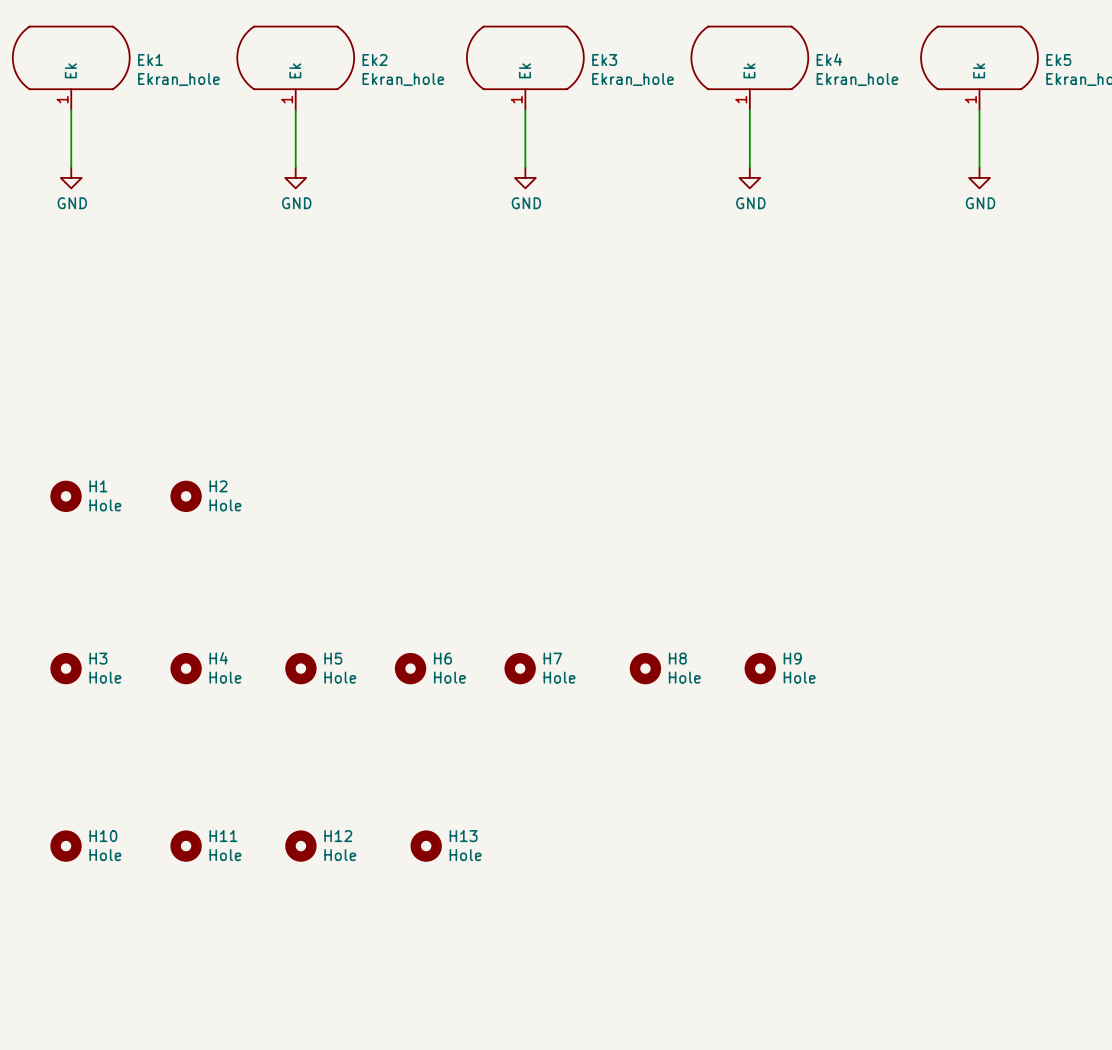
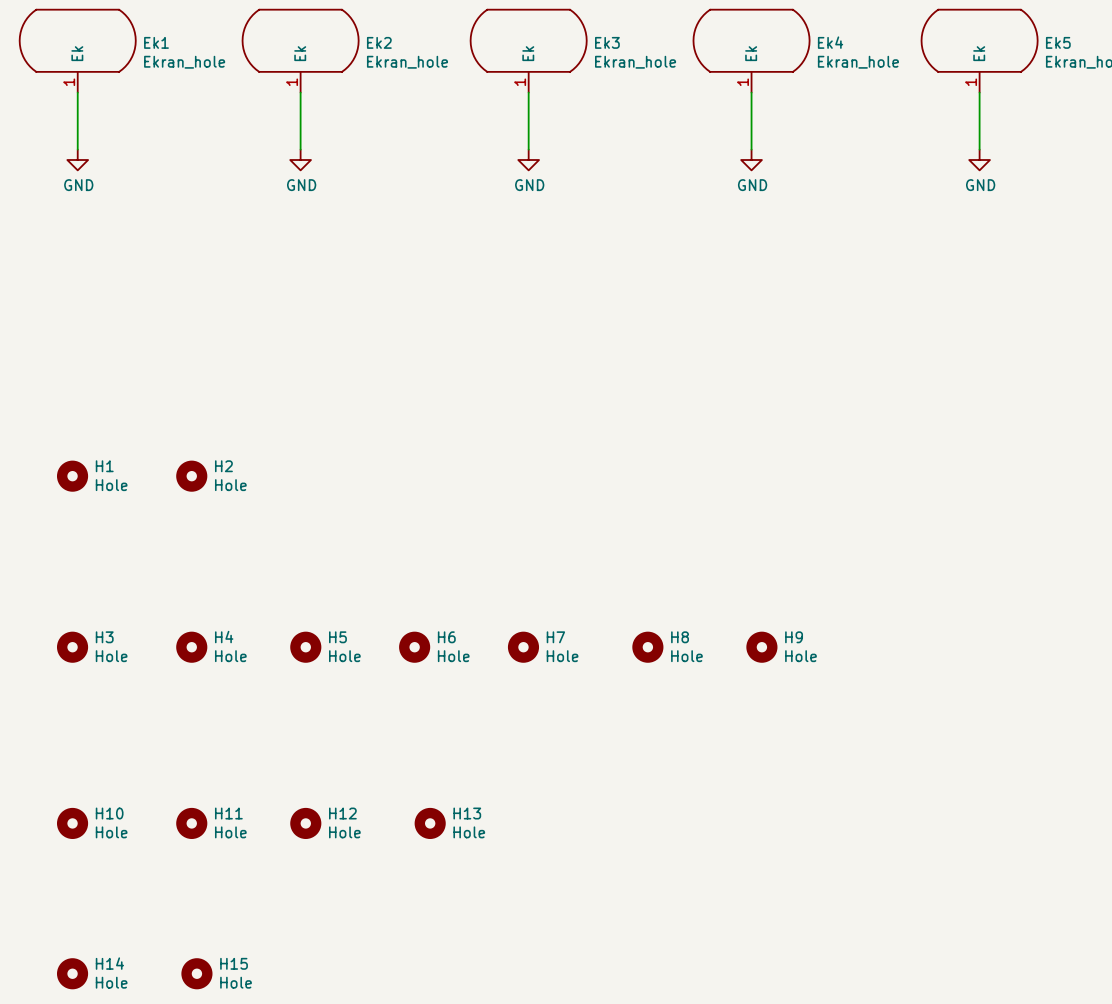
H14: none -> Hole (72, 973)
H15: none -> Hole (196, 973)

